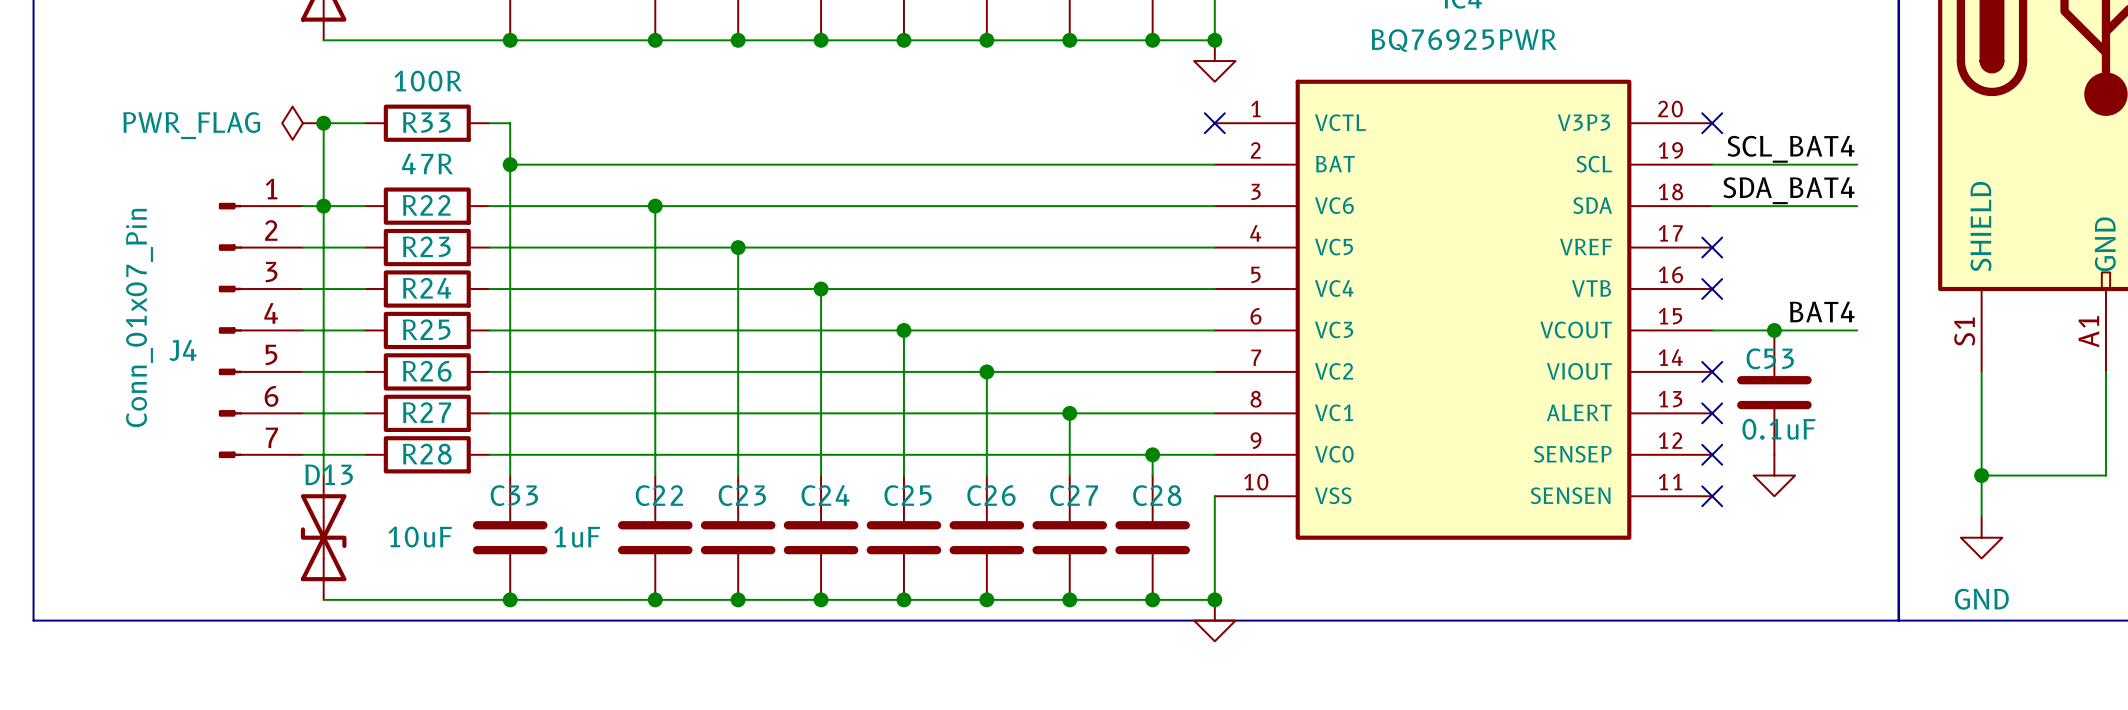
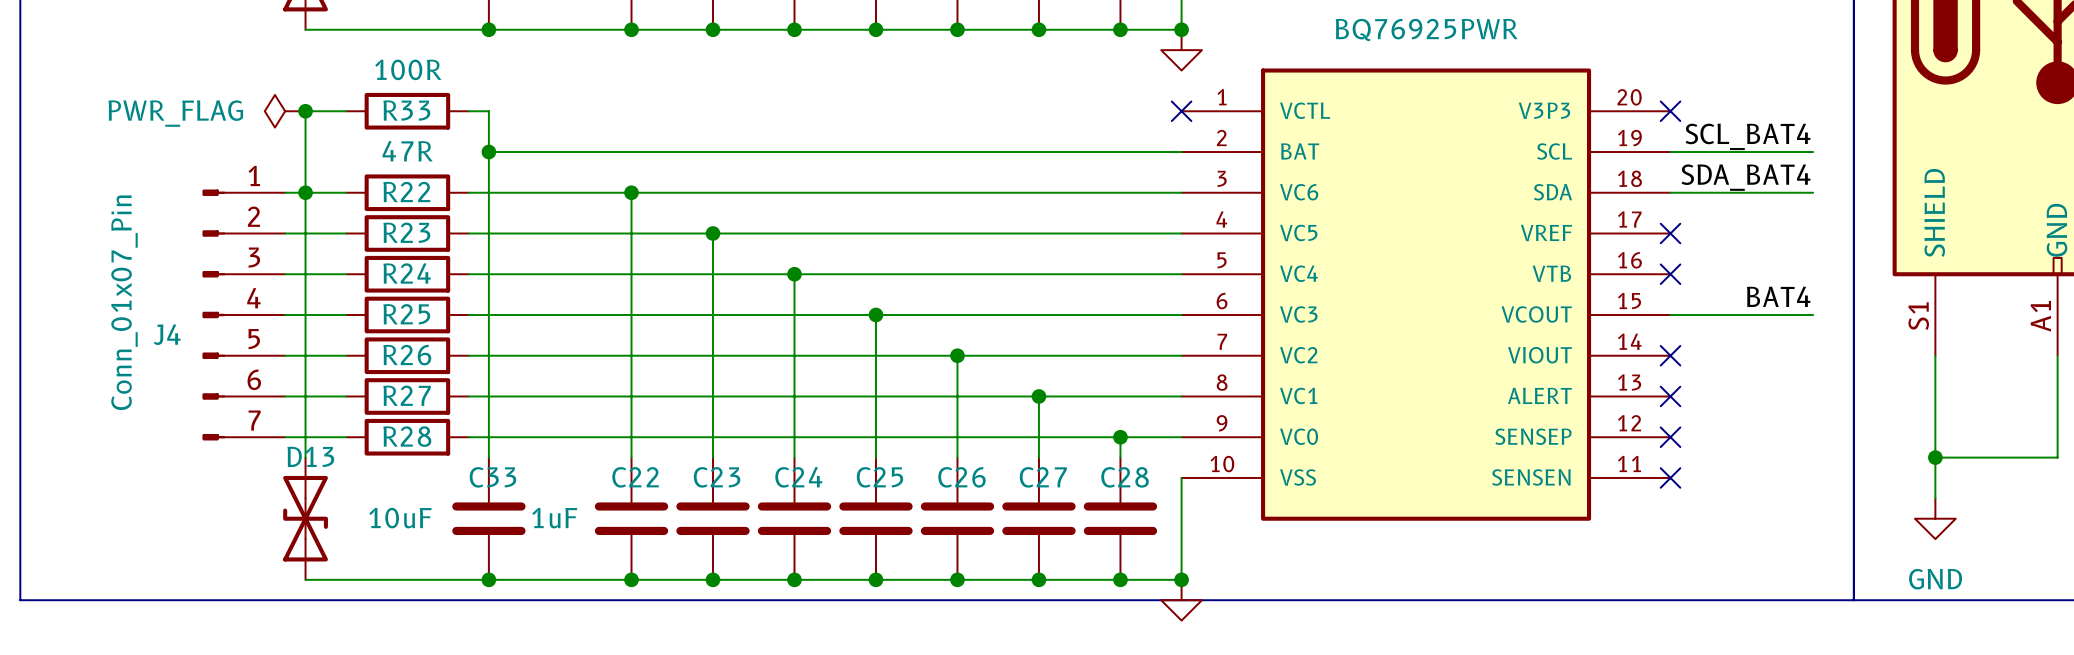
junction: (1774, 330) -> none
C53: 0.1uF (1774, 392) -> none
power symbol: (1774, 475) -> none

